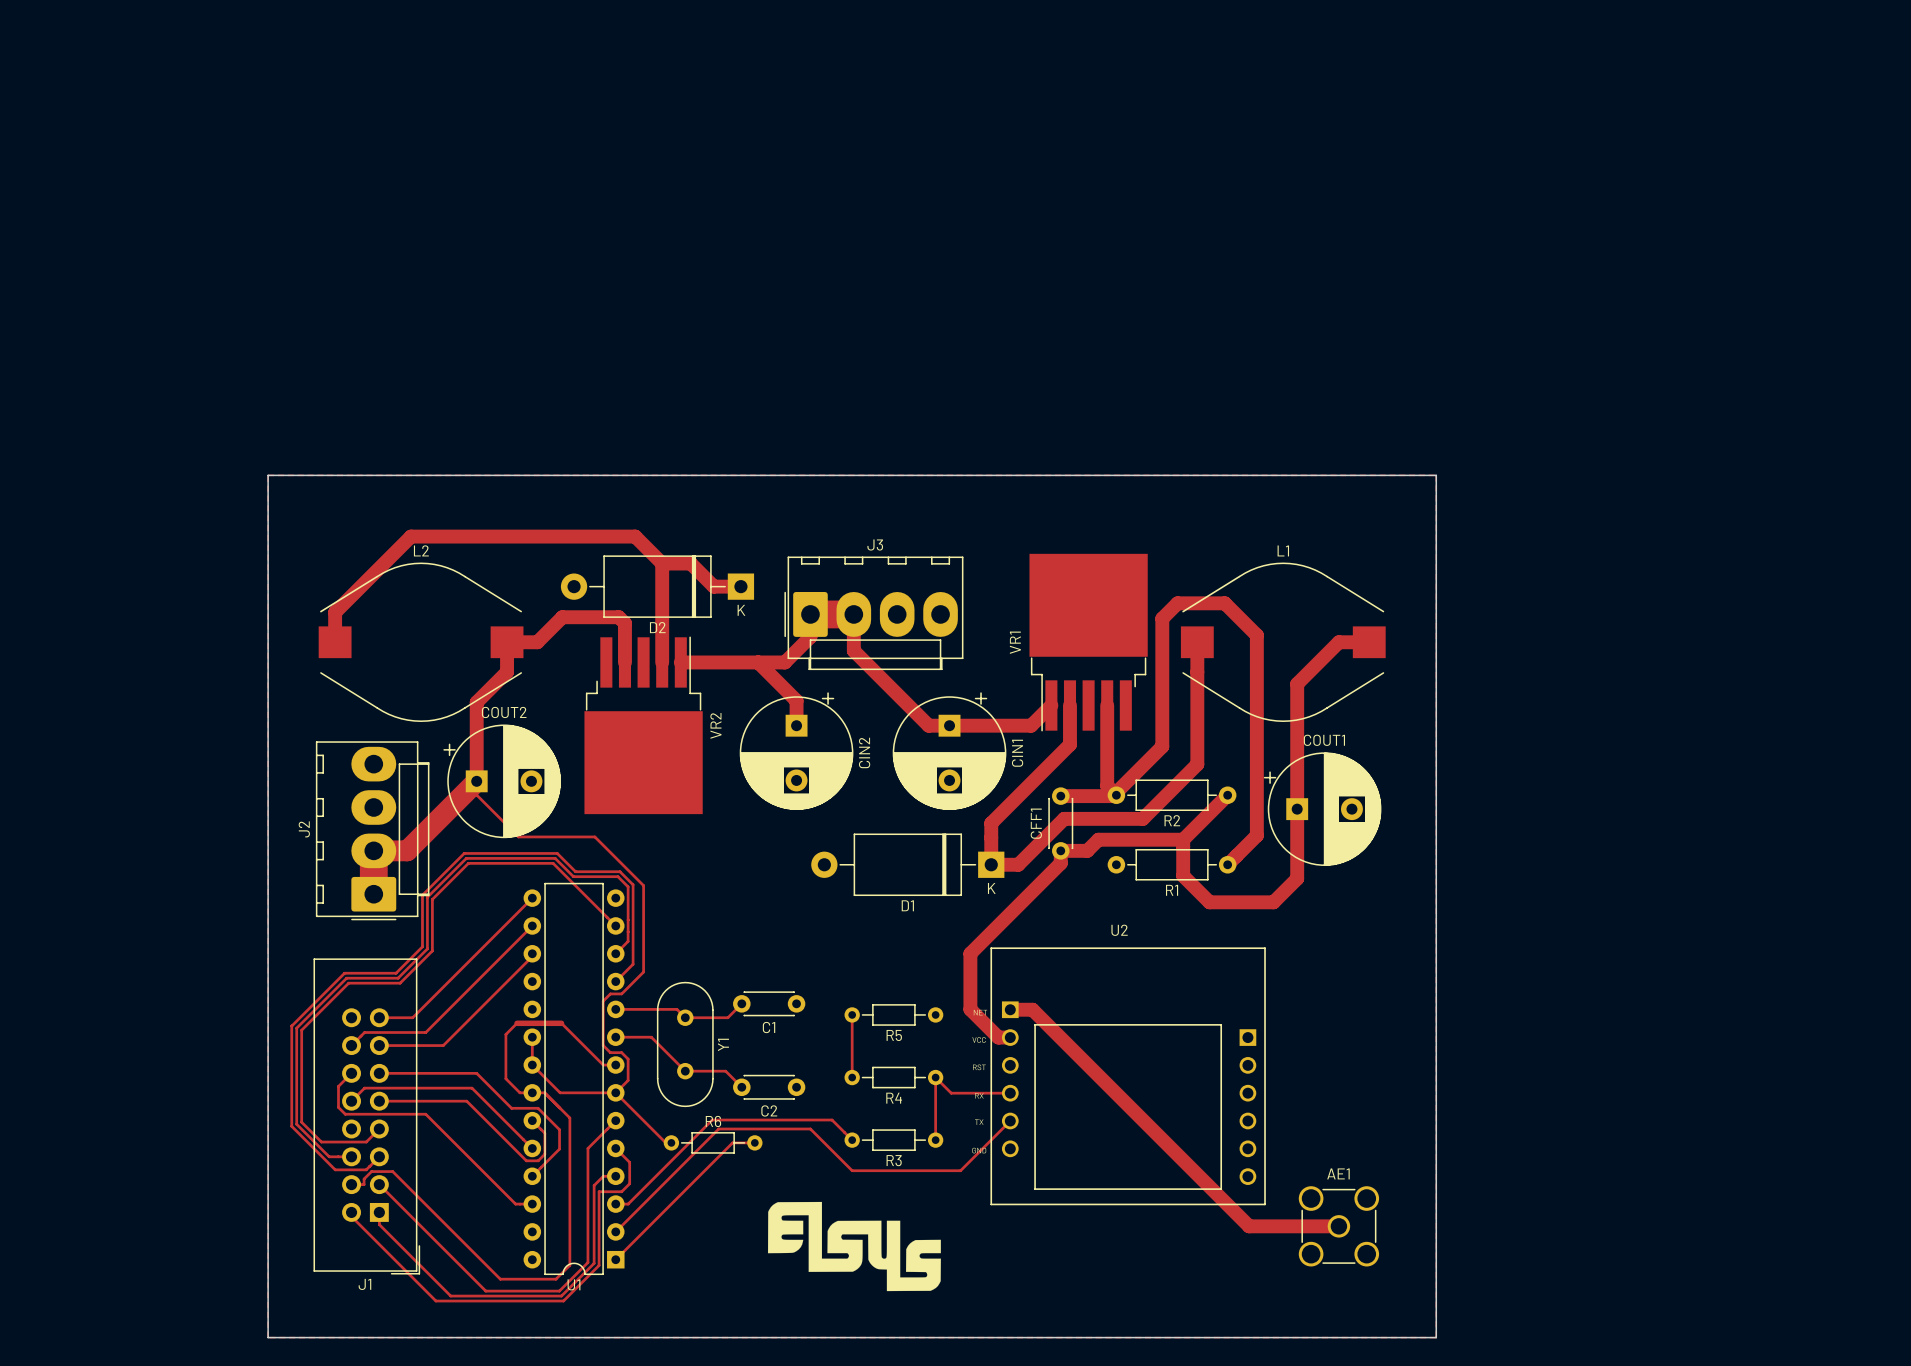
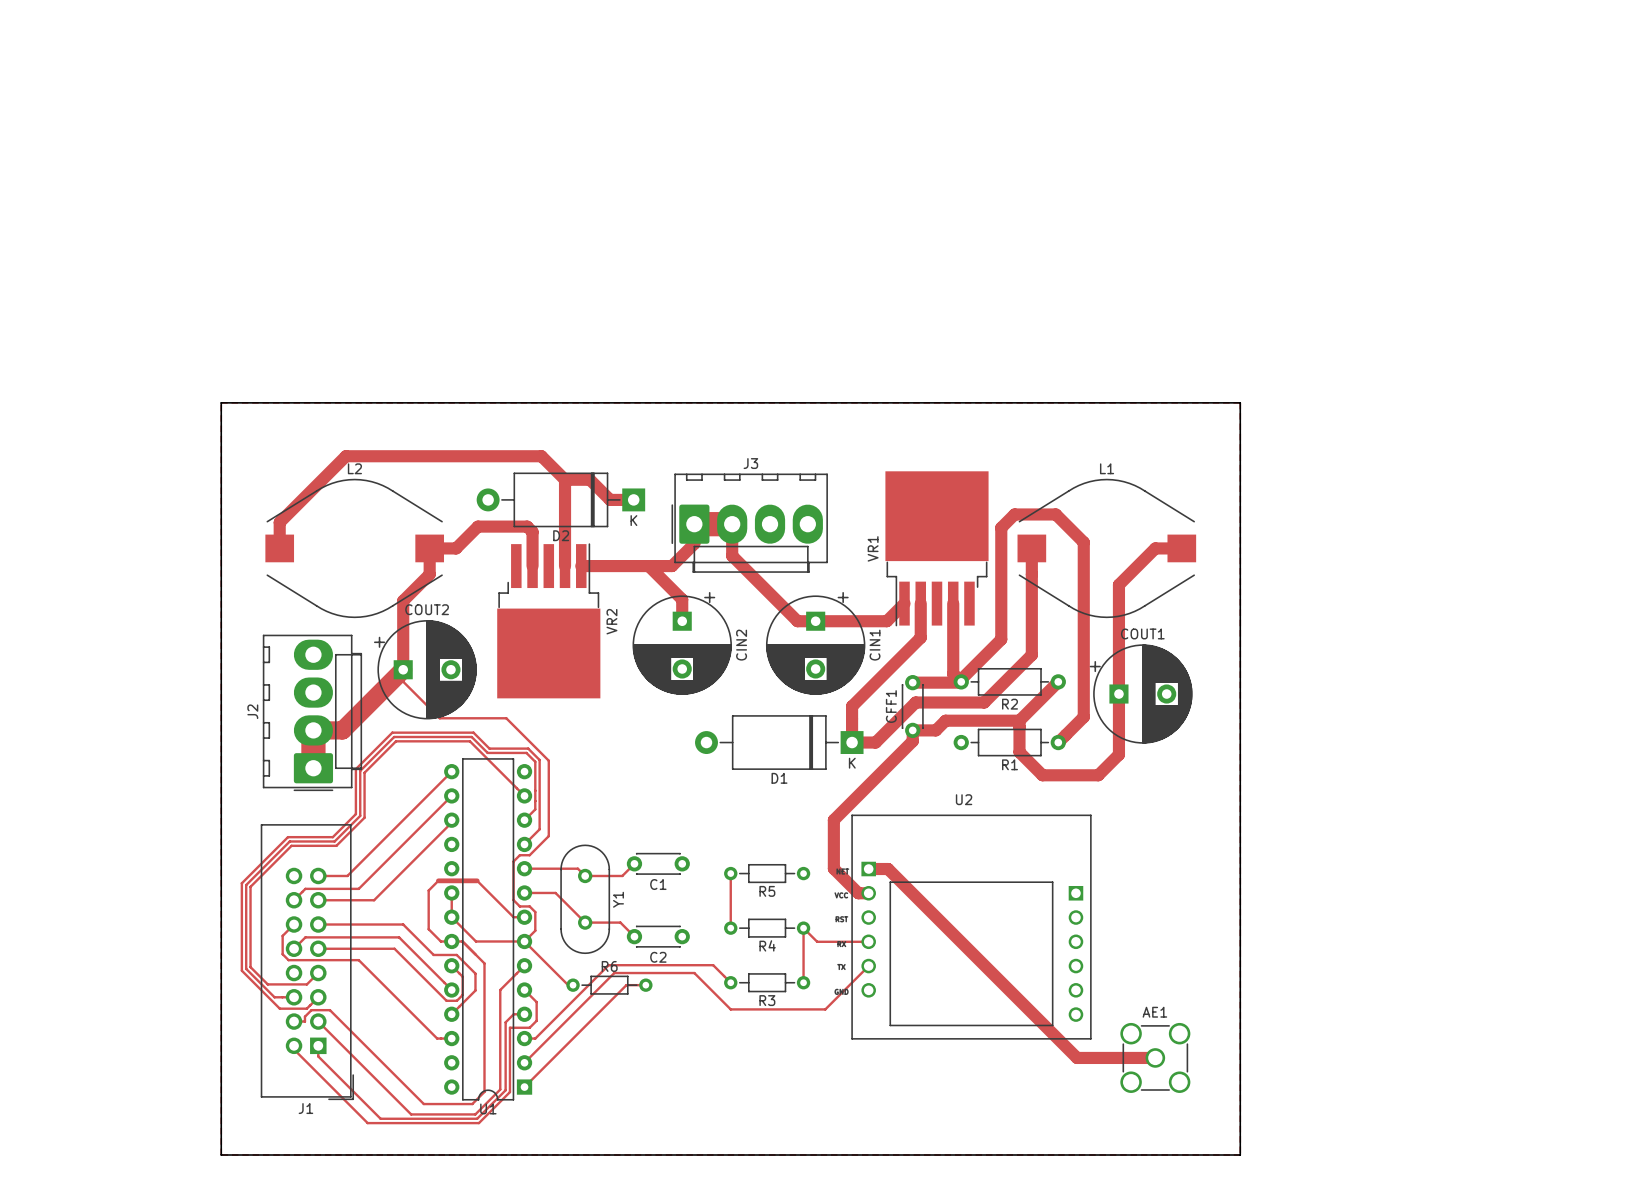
drawing: [767, 1201, 941, 1292] -> none

